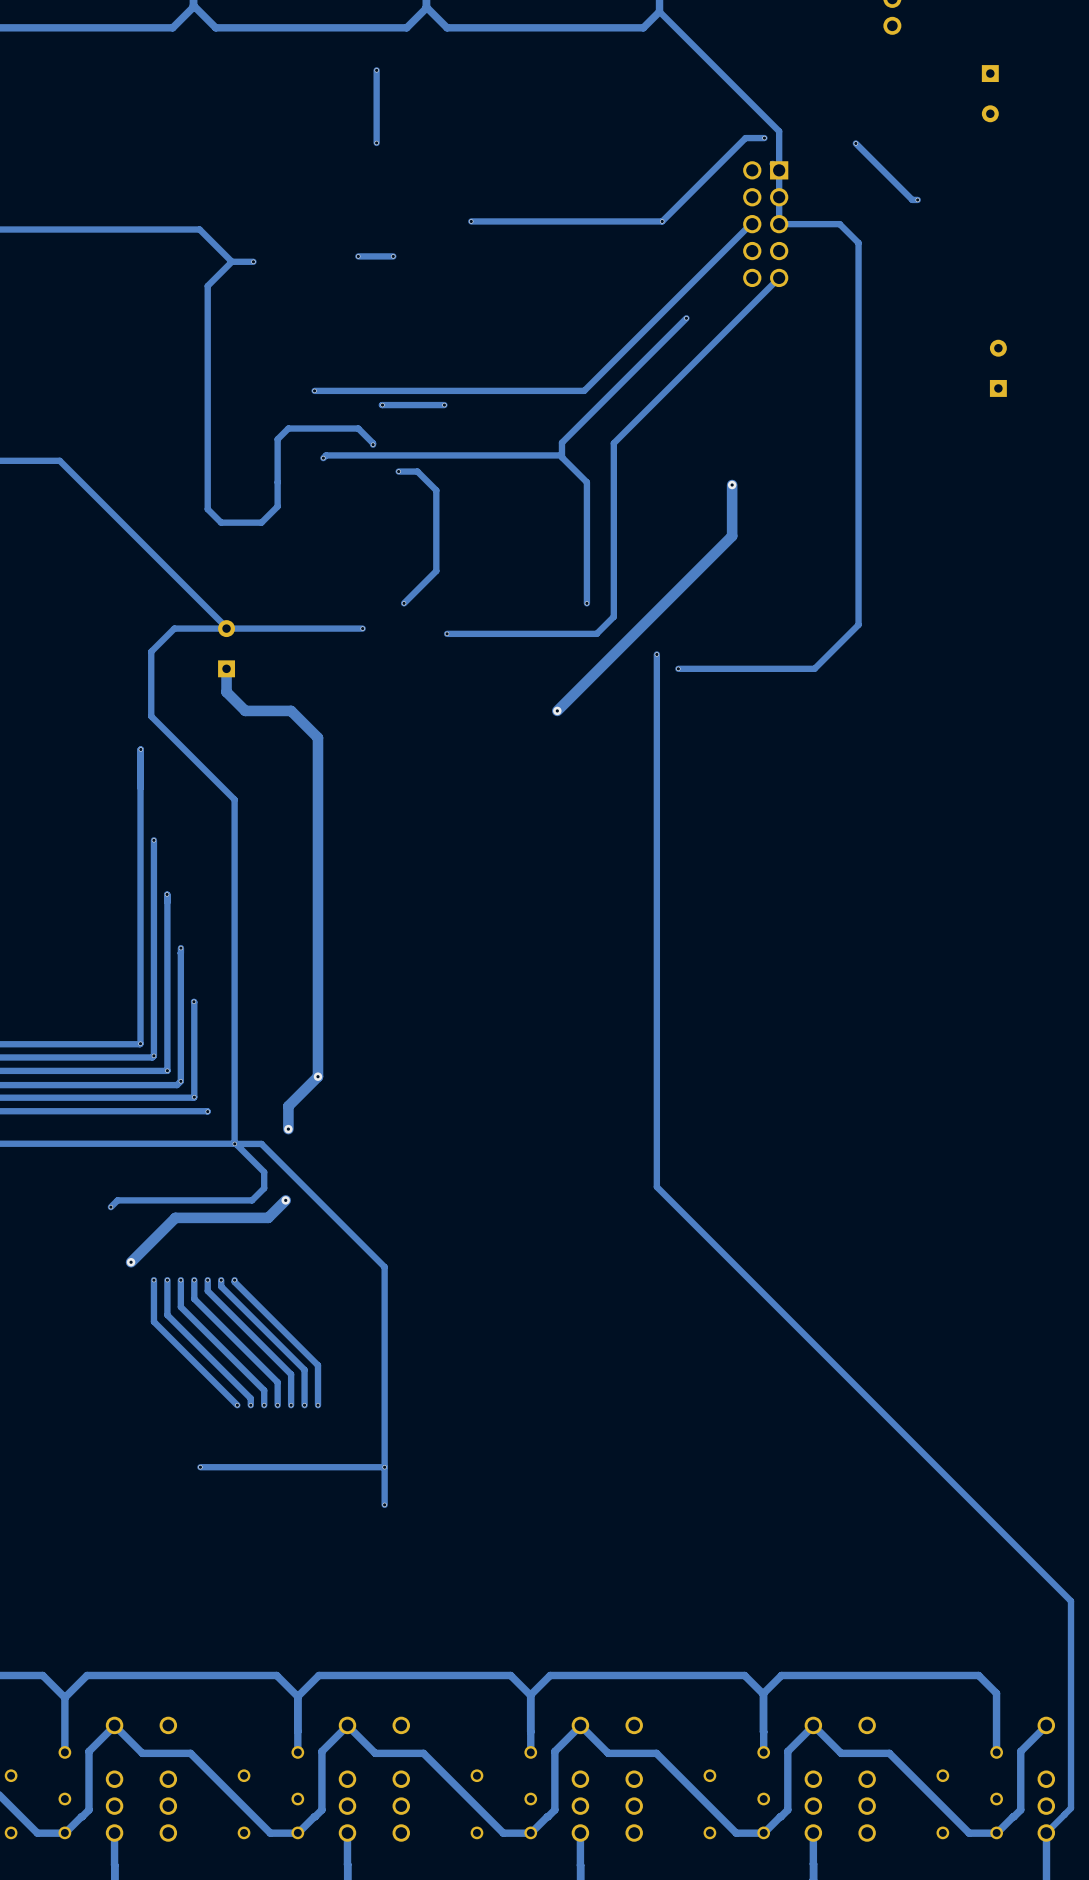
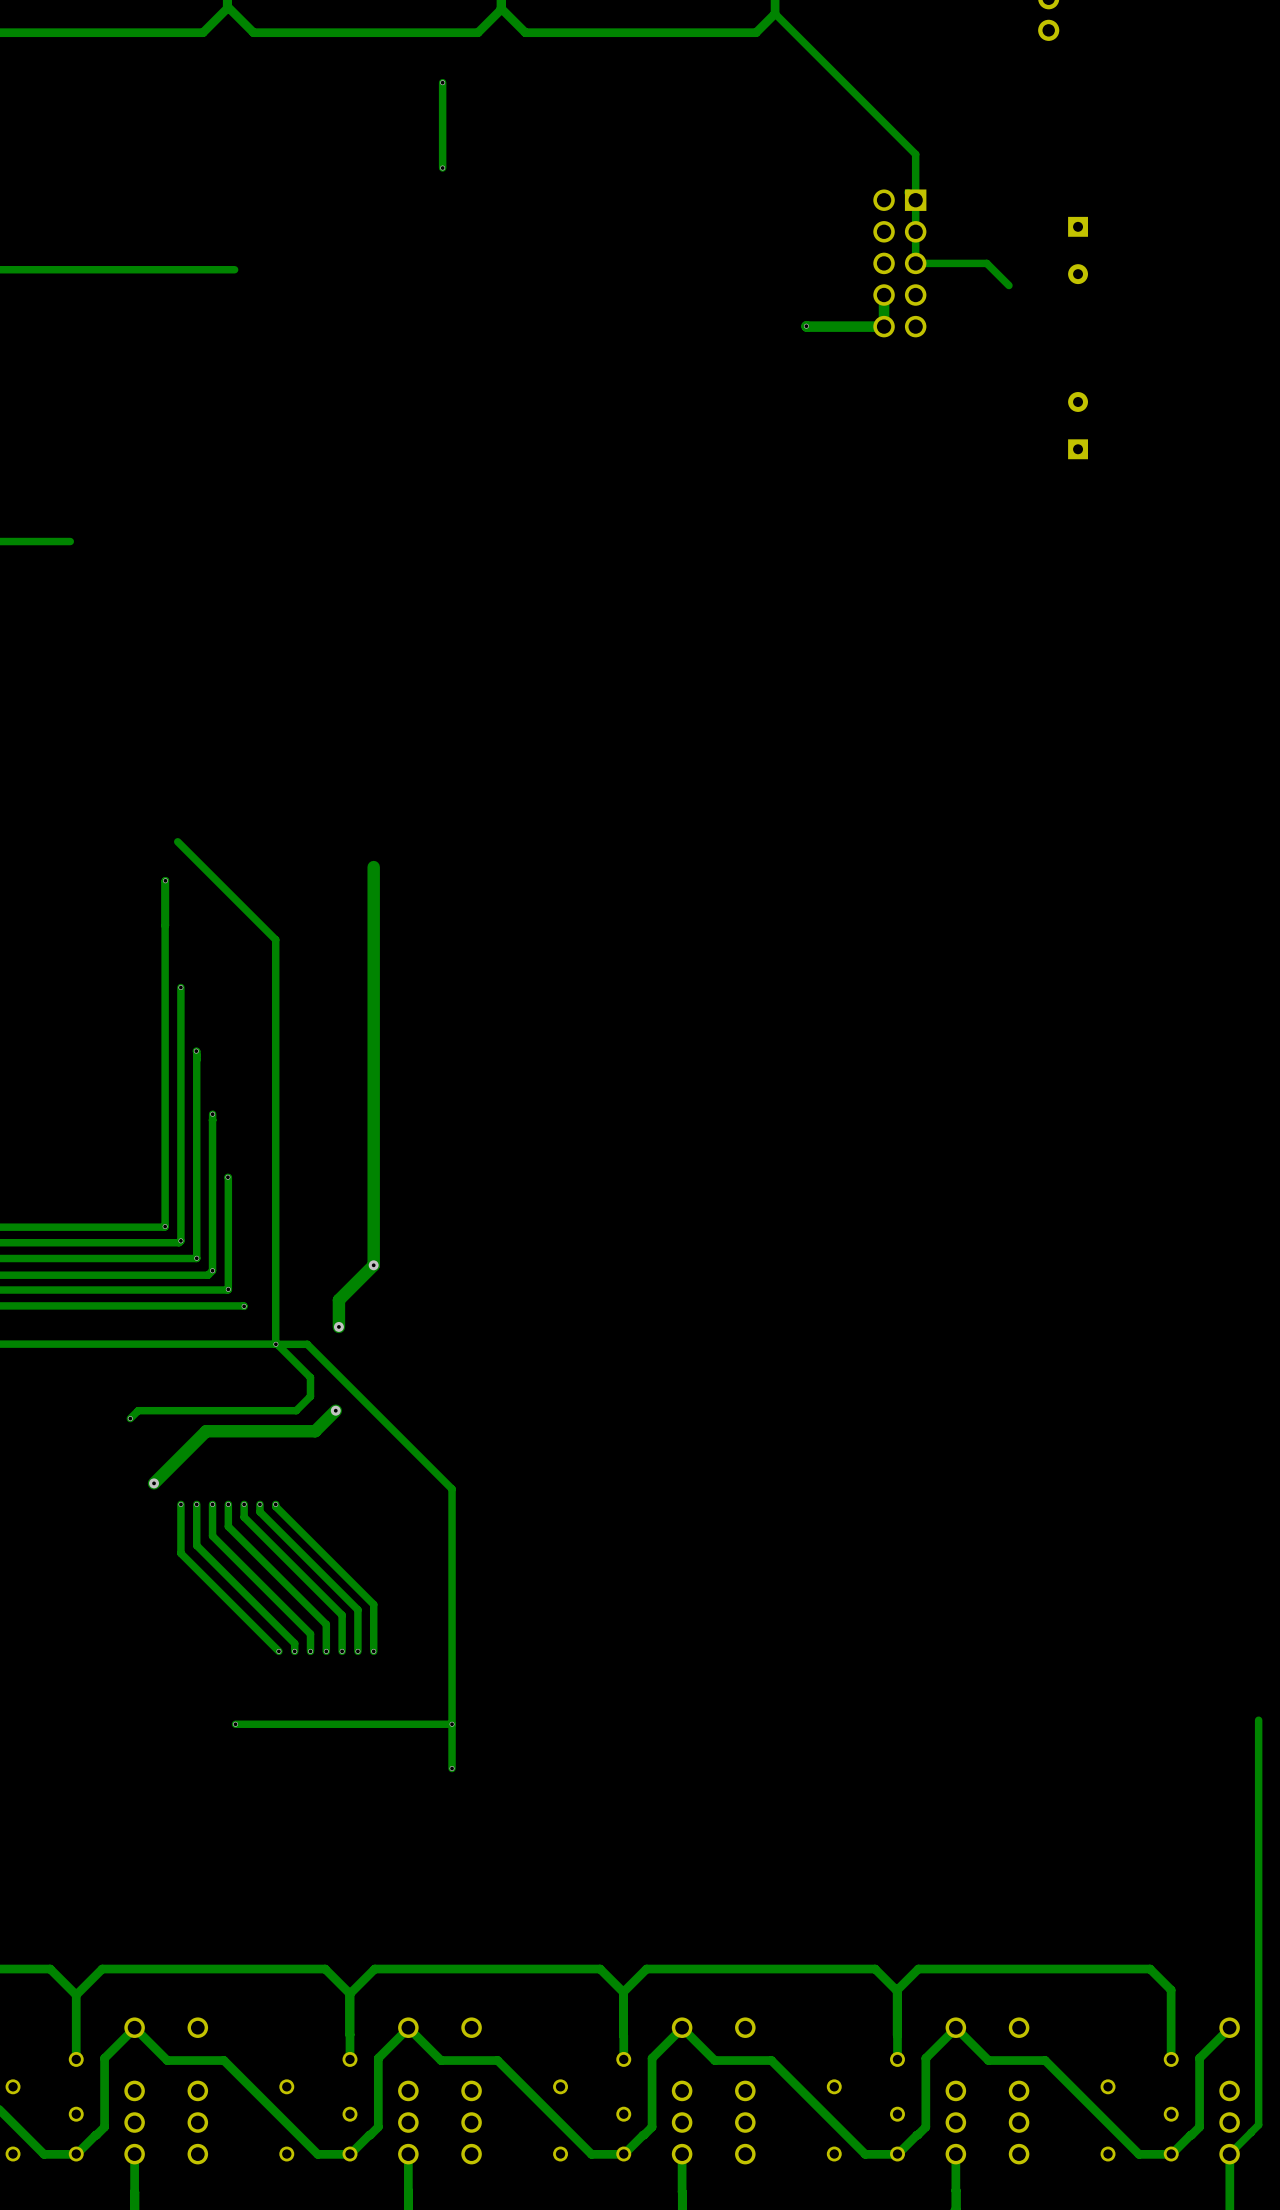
part: (990, 93) -> none
track: (764, 138) (745, 138) (662, 221) (471, 221) -> none
via: (764, 138) -> none
track: (855, 143) (912, 199) (917, 199) -> none
via: (855, 143) -> none
via: (917, 199) -> none
part: none -> (1078, 250)
via: (471, 221) -> none
via: (662, 221) -> none
track: (750, 224) (584, 390) (314, 390) -> none
track: (199, 229) (231, 261) -> none
track: (858, 242) (858, 624) (814, 668) (678, 668) -> none
track: none -> (884, 295) (884, 326) (806, 326)
via: (358, 256) -> none
track: (393, 256) (358, 256) -> none
via: (393, 256) -> none
track: (231, 261) (207, 286) (207, 509) (221, 522) (261, 522) (277, 506) (277, 439) (288, 428) (358, 428) (373, 444) -> none
track: (253, 261) (231, 261) -> none
via: (253, 261) -> none
via: none -> (806, 326)
track: (779, 277) (613, 443) (613, 616) (596, 633) (447, 633) -> none
track: (686, 318) (561, 442) (561, 457) (586, 482) (586, 603) -> none
via: (686, 318) -> none
part position: (998, 368) -> (1078, 425)
via: (314, 390) -> none
via: (382, 405) -> none
track: (444, 405) (381, 405) -> none
via: (444, 405) -> none
via: (373, 444) -> none
track: (561, 456) (326, 455) (323, 458) -> none
via: (323, 458) -> none
track: (59, 460) (226, 628) -> none
track: (398, 471) (417, 471) (436, 490) (436, 571) (404, 603) -> none
via: (398, 471) -> none
track: (732, 485) (732, 536) (557, 710) -> none
via: (732, 485) -> none
via: (404, 603) -> none
via: (586, 603) -> none
track: (362, 628) (174, 628) (151, 651) (151, 716) -> none
via: (362, 628) -> none
via: (447, 633) -> none
part: (226, 648) -> none
track: (656, 654) (656, 1186) (1071, 1601) -> (1258, 1720) (1258, 1881)
via: (656, 654) -> none
track: (226, 668) (226, 692) (245, 710) (291, 710) (317, 737) -> none
via: (678, 668) -> none
via: (557, 710) -> none

